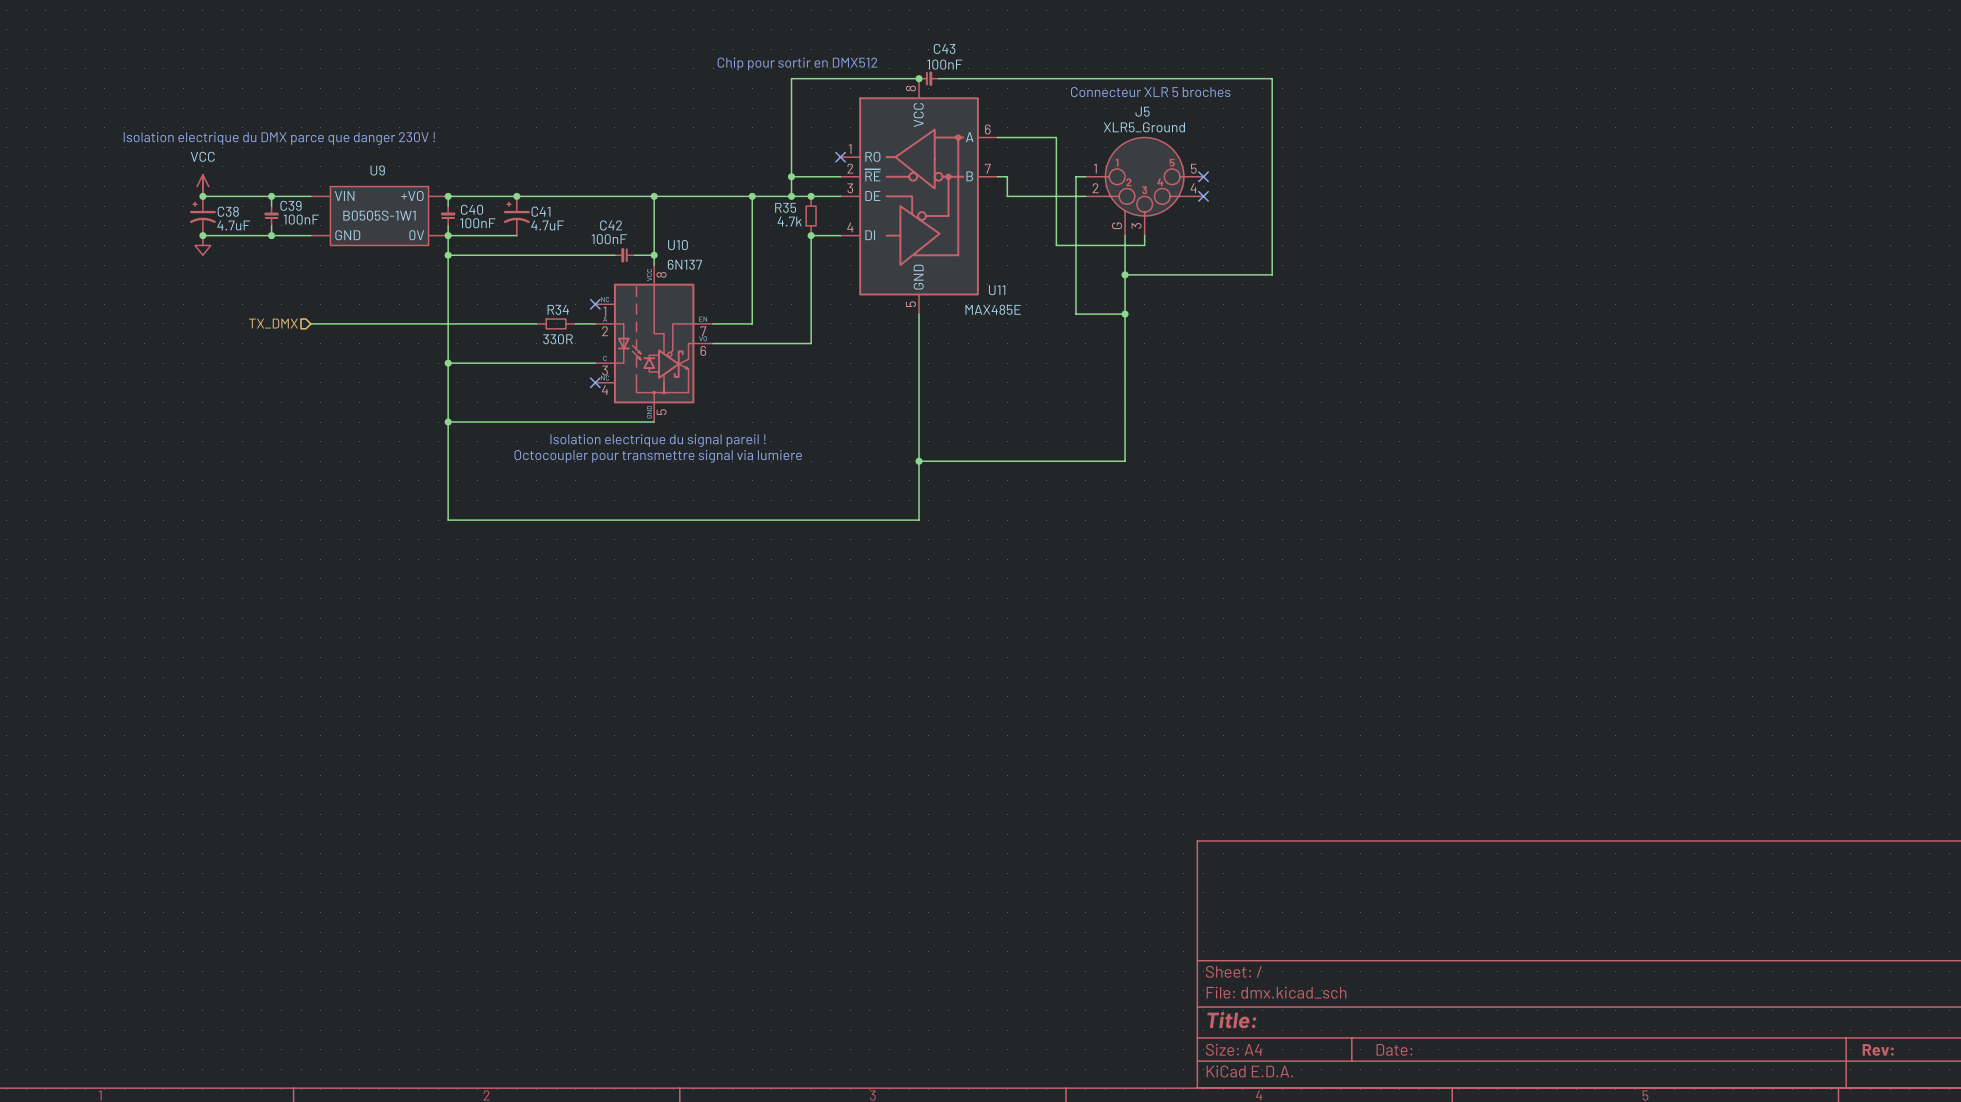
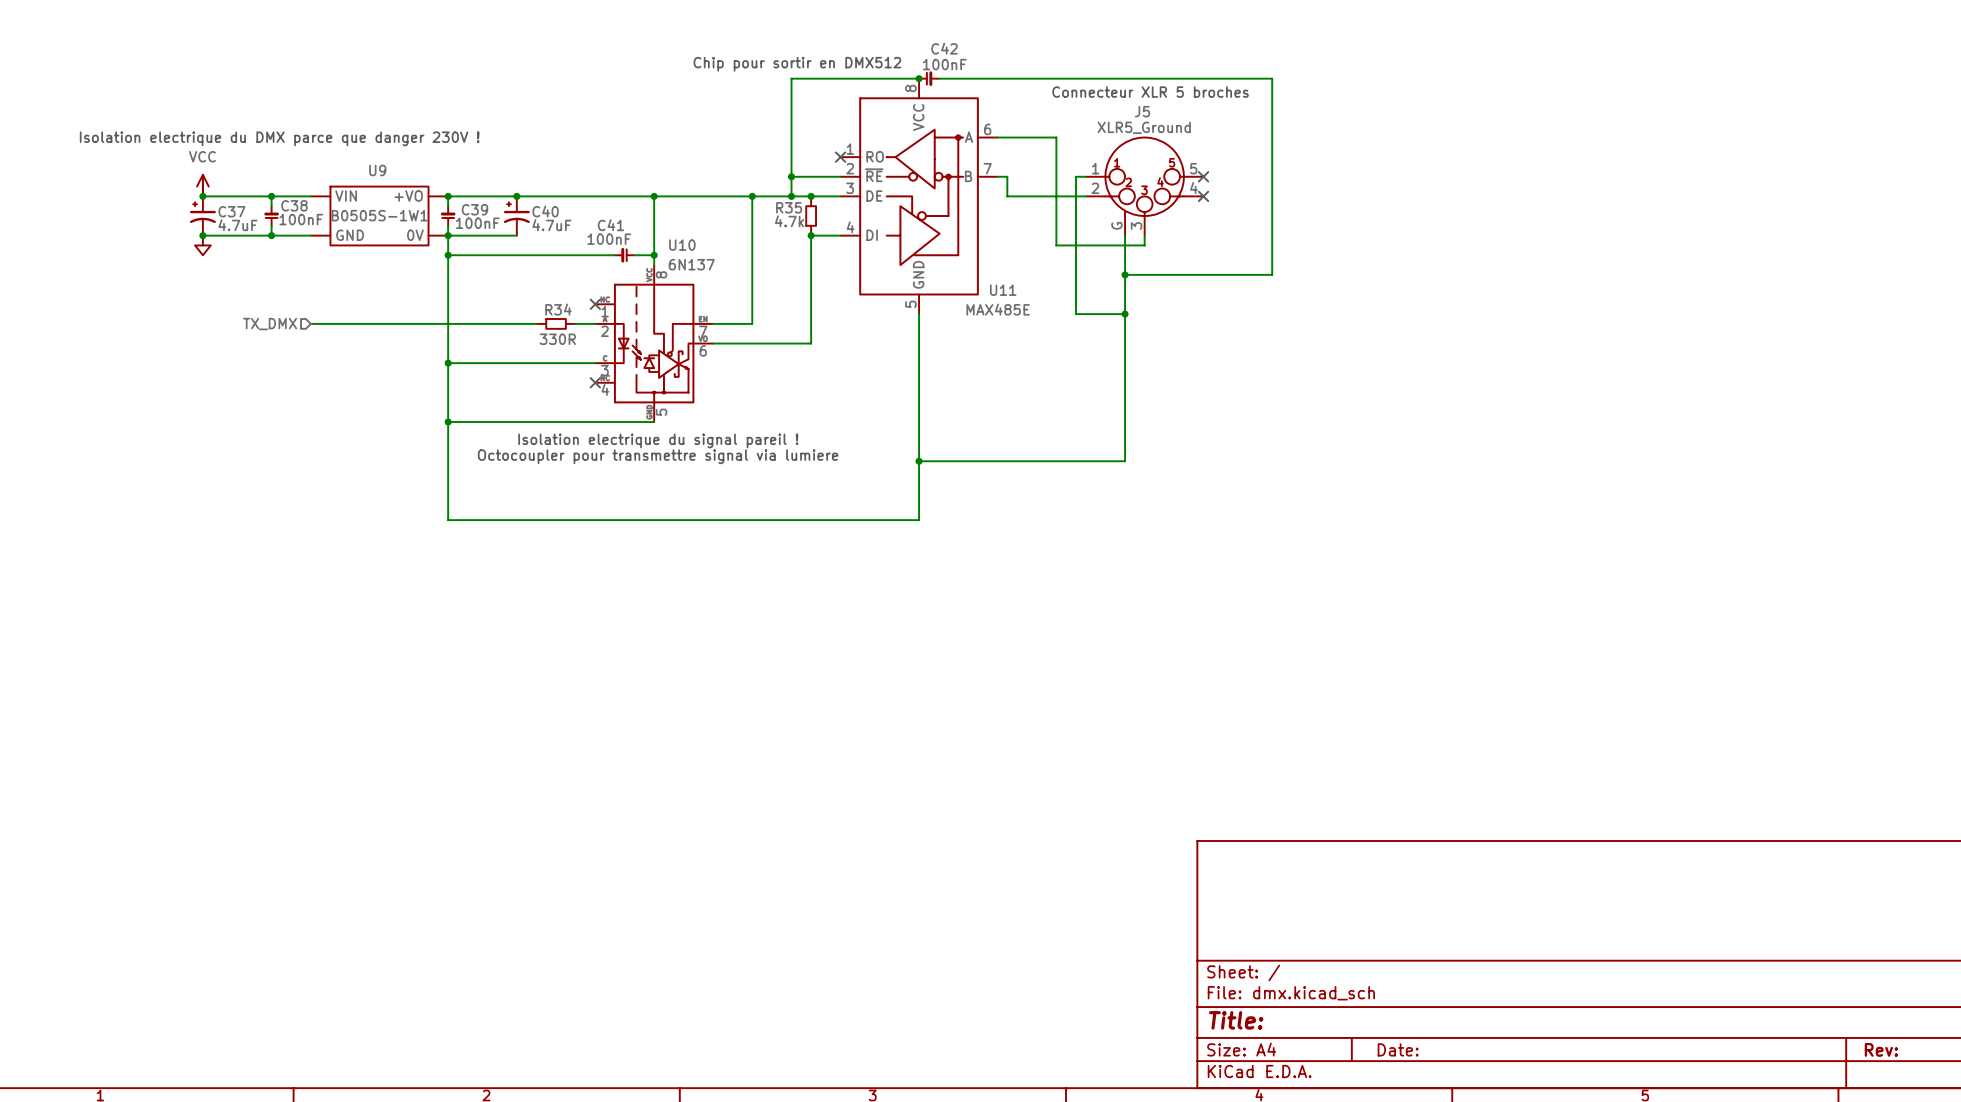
C43 name: C43 (944, 48) -> C42 (944, 48)
C39 name: C39 (290, 205) -> C38 (294, 205)
C40 name: C40 (472, 209) -> C39 (474, 209)
C38 name: C38 (228, 211) -> C37 (231, 211)
C41 name: C41 (540, 211) -> C40 (545, 211)
C42 name: C42 (611, 225) -> C41 (611, 225)

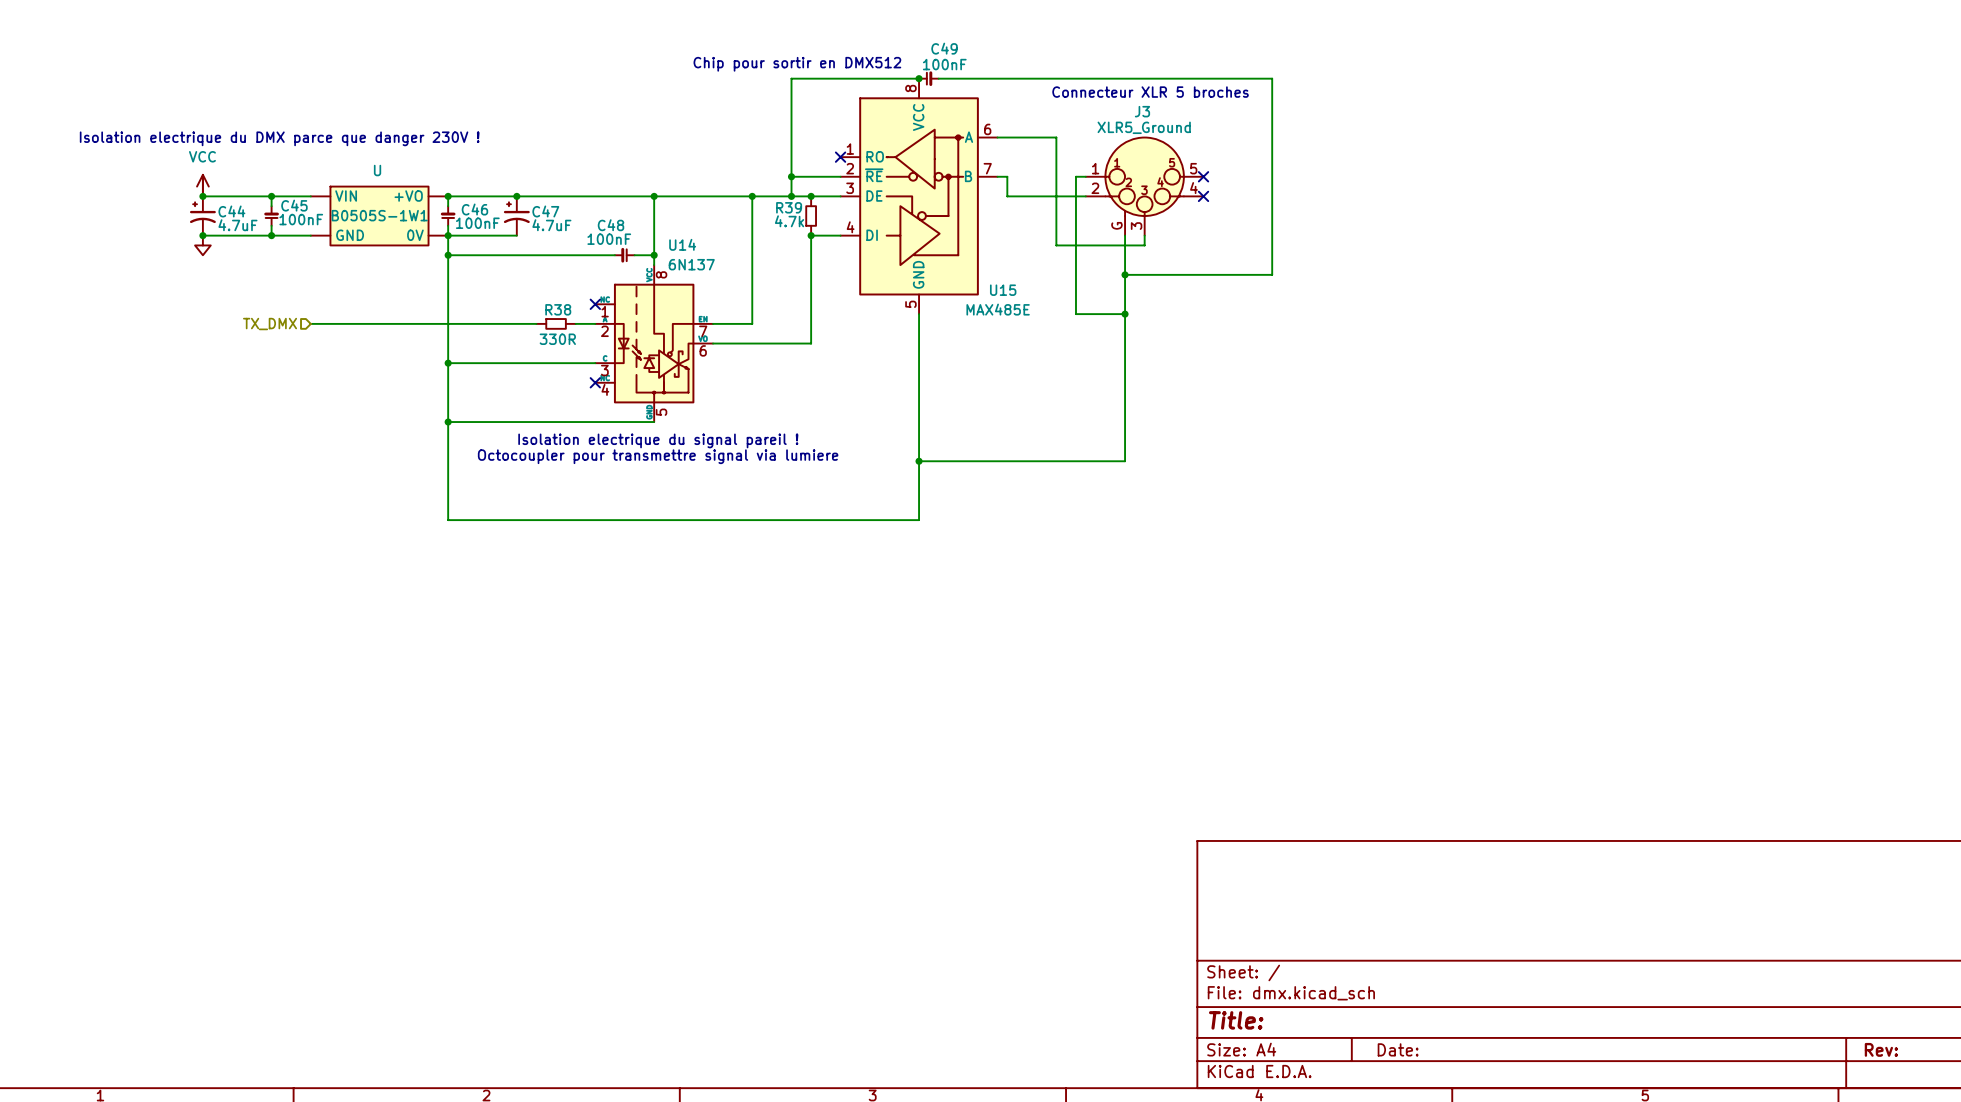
C42 name: C42 (944, 48) -> C49 (944, 48)
J5 name: J5 (1142, 111) -> J3 (1142, 111)
U9 name: U9 (377, 170) -> U (377, 170)
C38 name: C38 (294, 205) -> C45 (294, 205)
R35 name: R35 (789, 207) -> R39 (789, 207)
C39 name: C39 (474, 209) -> C46 (474, 209)
C37 name: C37 (231, 211) -> C44 (231, 211)
C40 name: C40 (545, 211) -> C47 (545, 211)
C41 name: C41 (611, 225) -> C48 (611, 225)
U10 name: U10 (682, 245) -> U14 (682, 244)
U11 name: U11 (1003, 290) -> U15 (1003, 290)
R34 name: R34 (558, 309) -> R38 (558, 309)

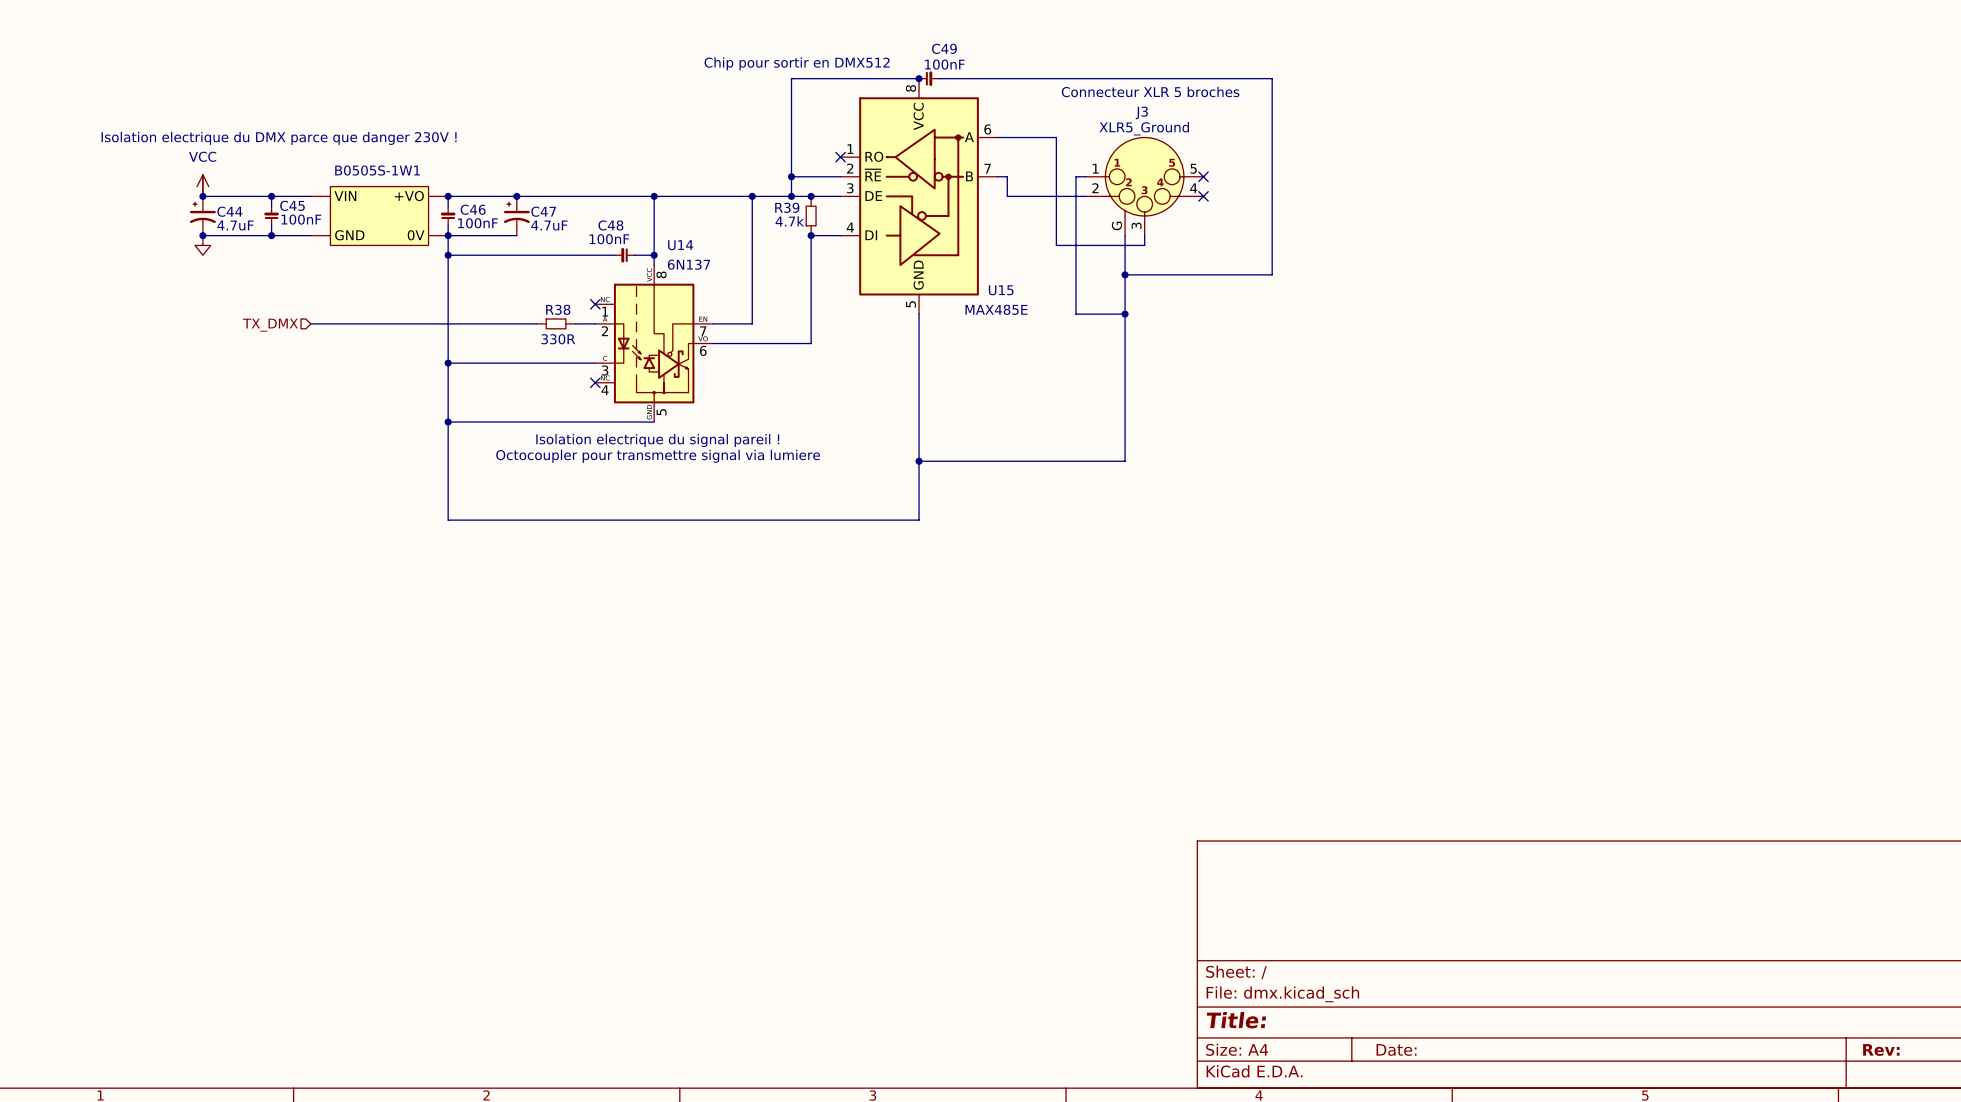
U name: U (377, 170) -> B0505S-1W1 (377, 170)
U value: B0505S-1W1 (379, 215) -> none

